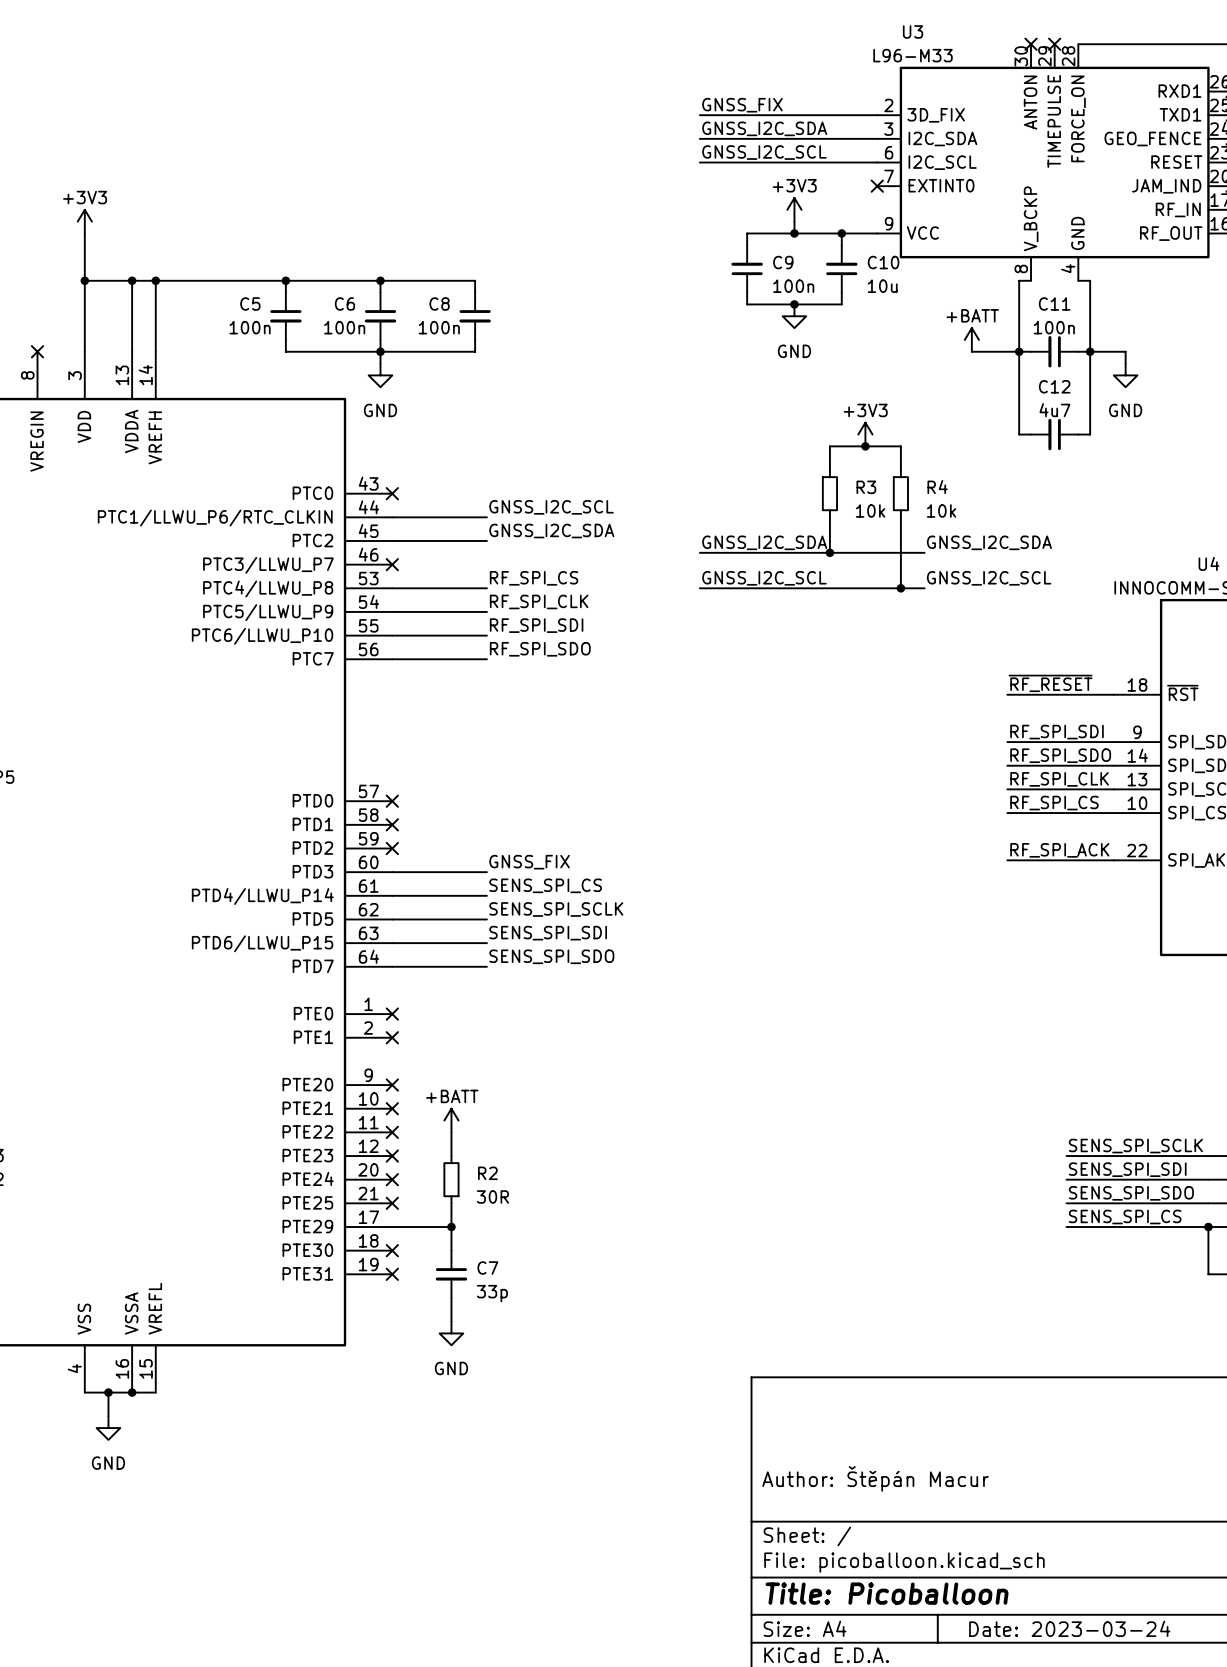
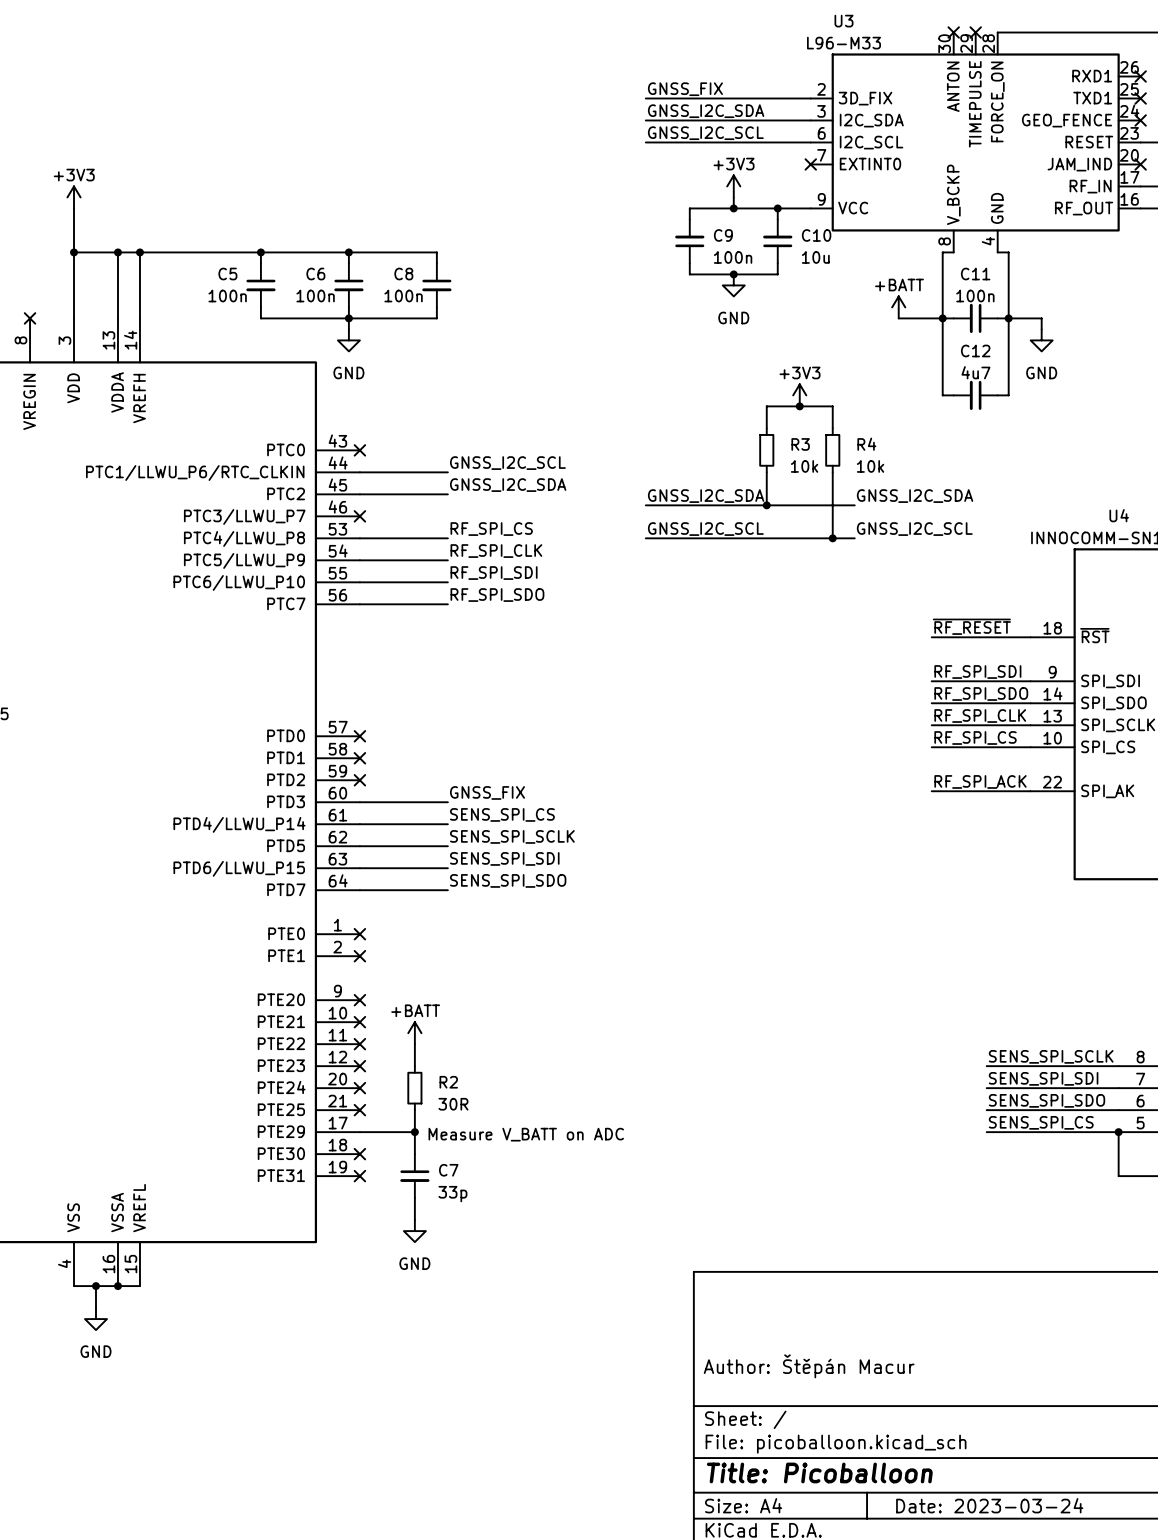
text: none -> Measure V_BATT on ADC (526, 1134)

